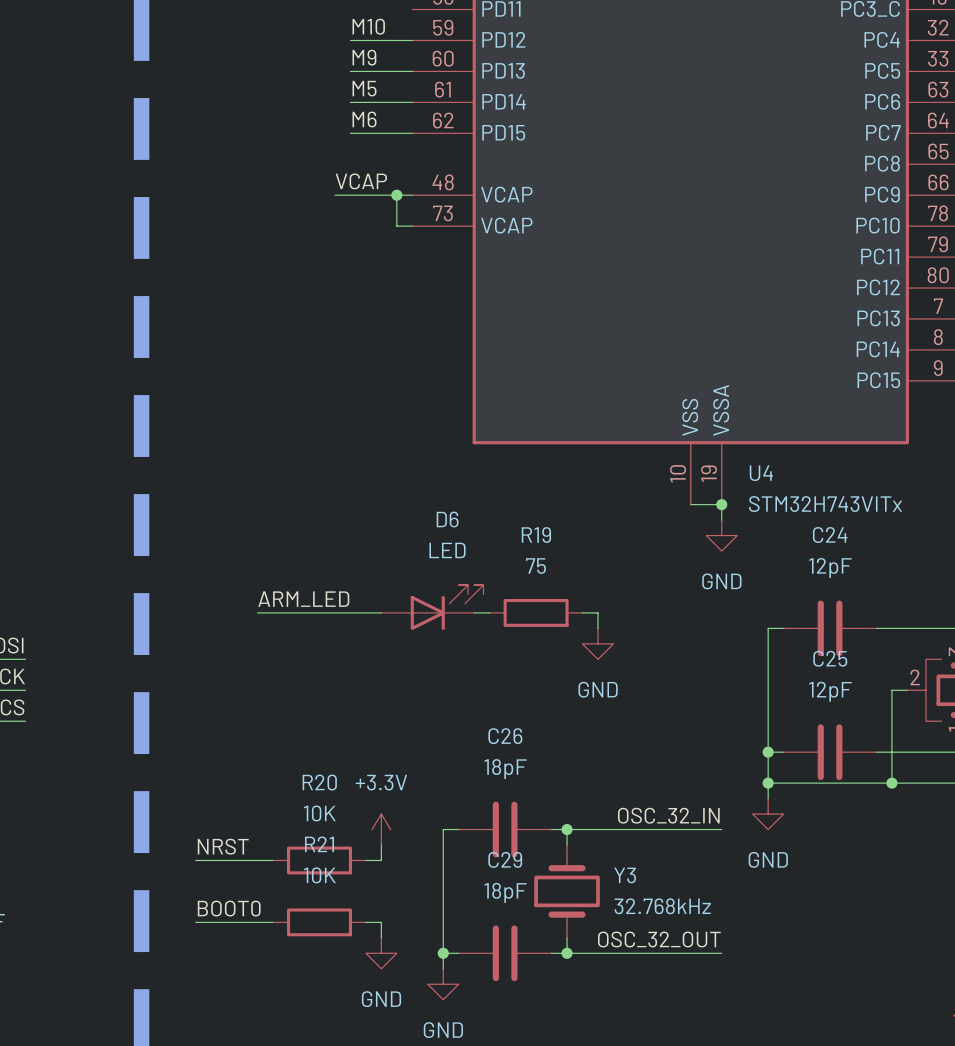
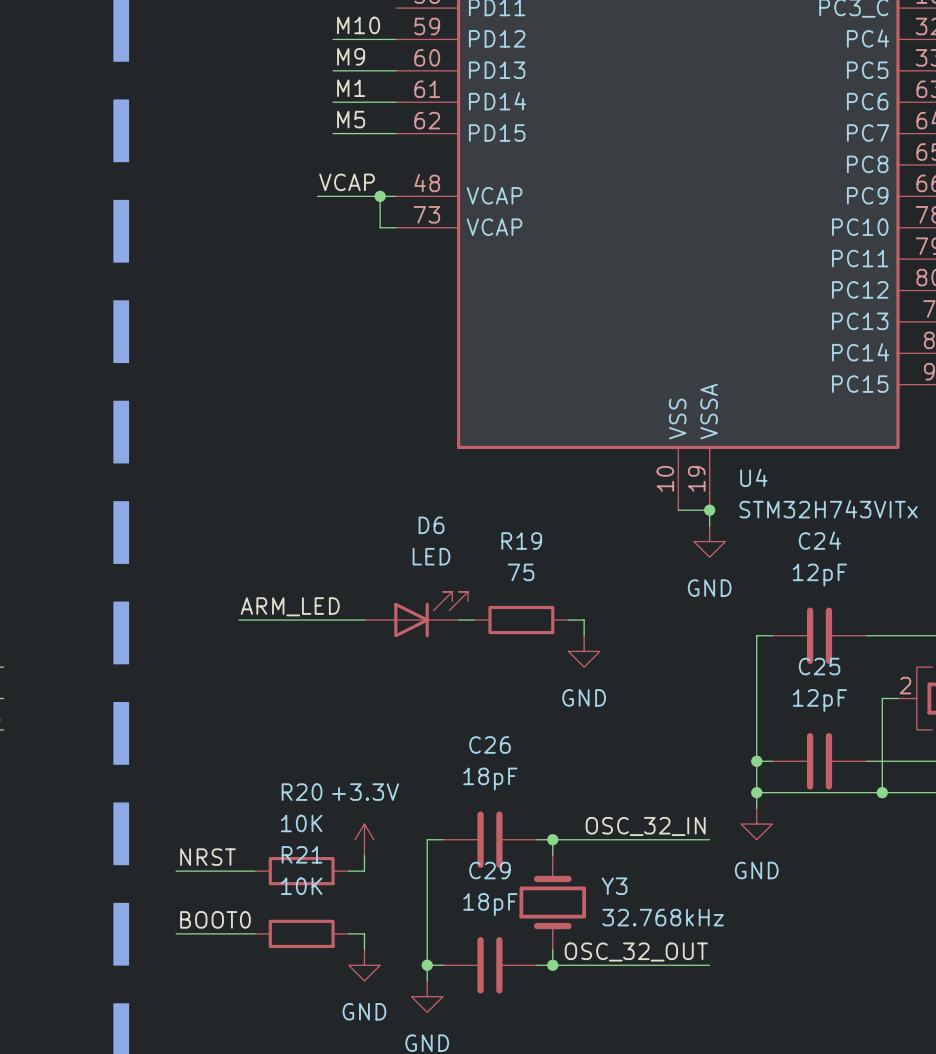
label: M5 (364, 88) -> M1 (351, 88)
label: M6 (364, 119) -> M5 (351, 119)

